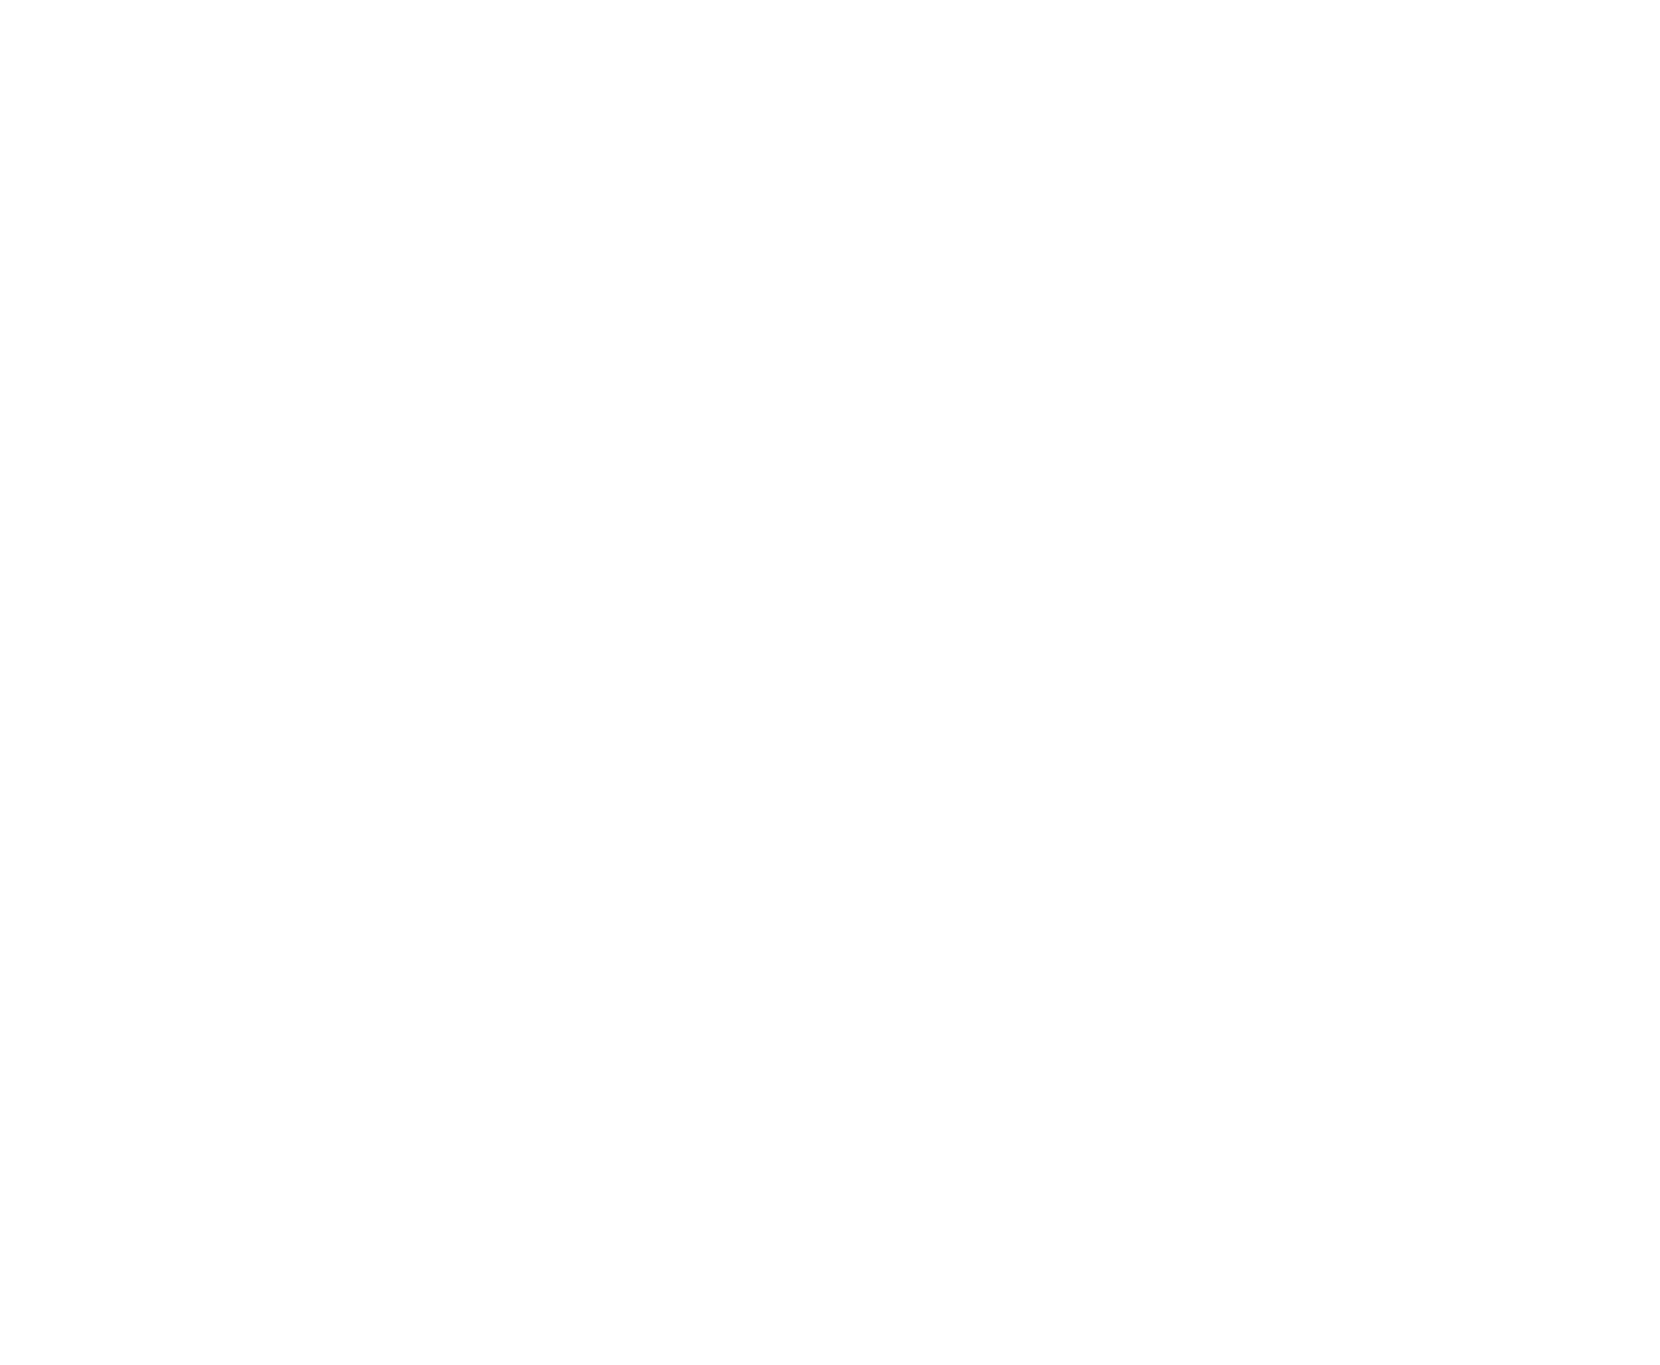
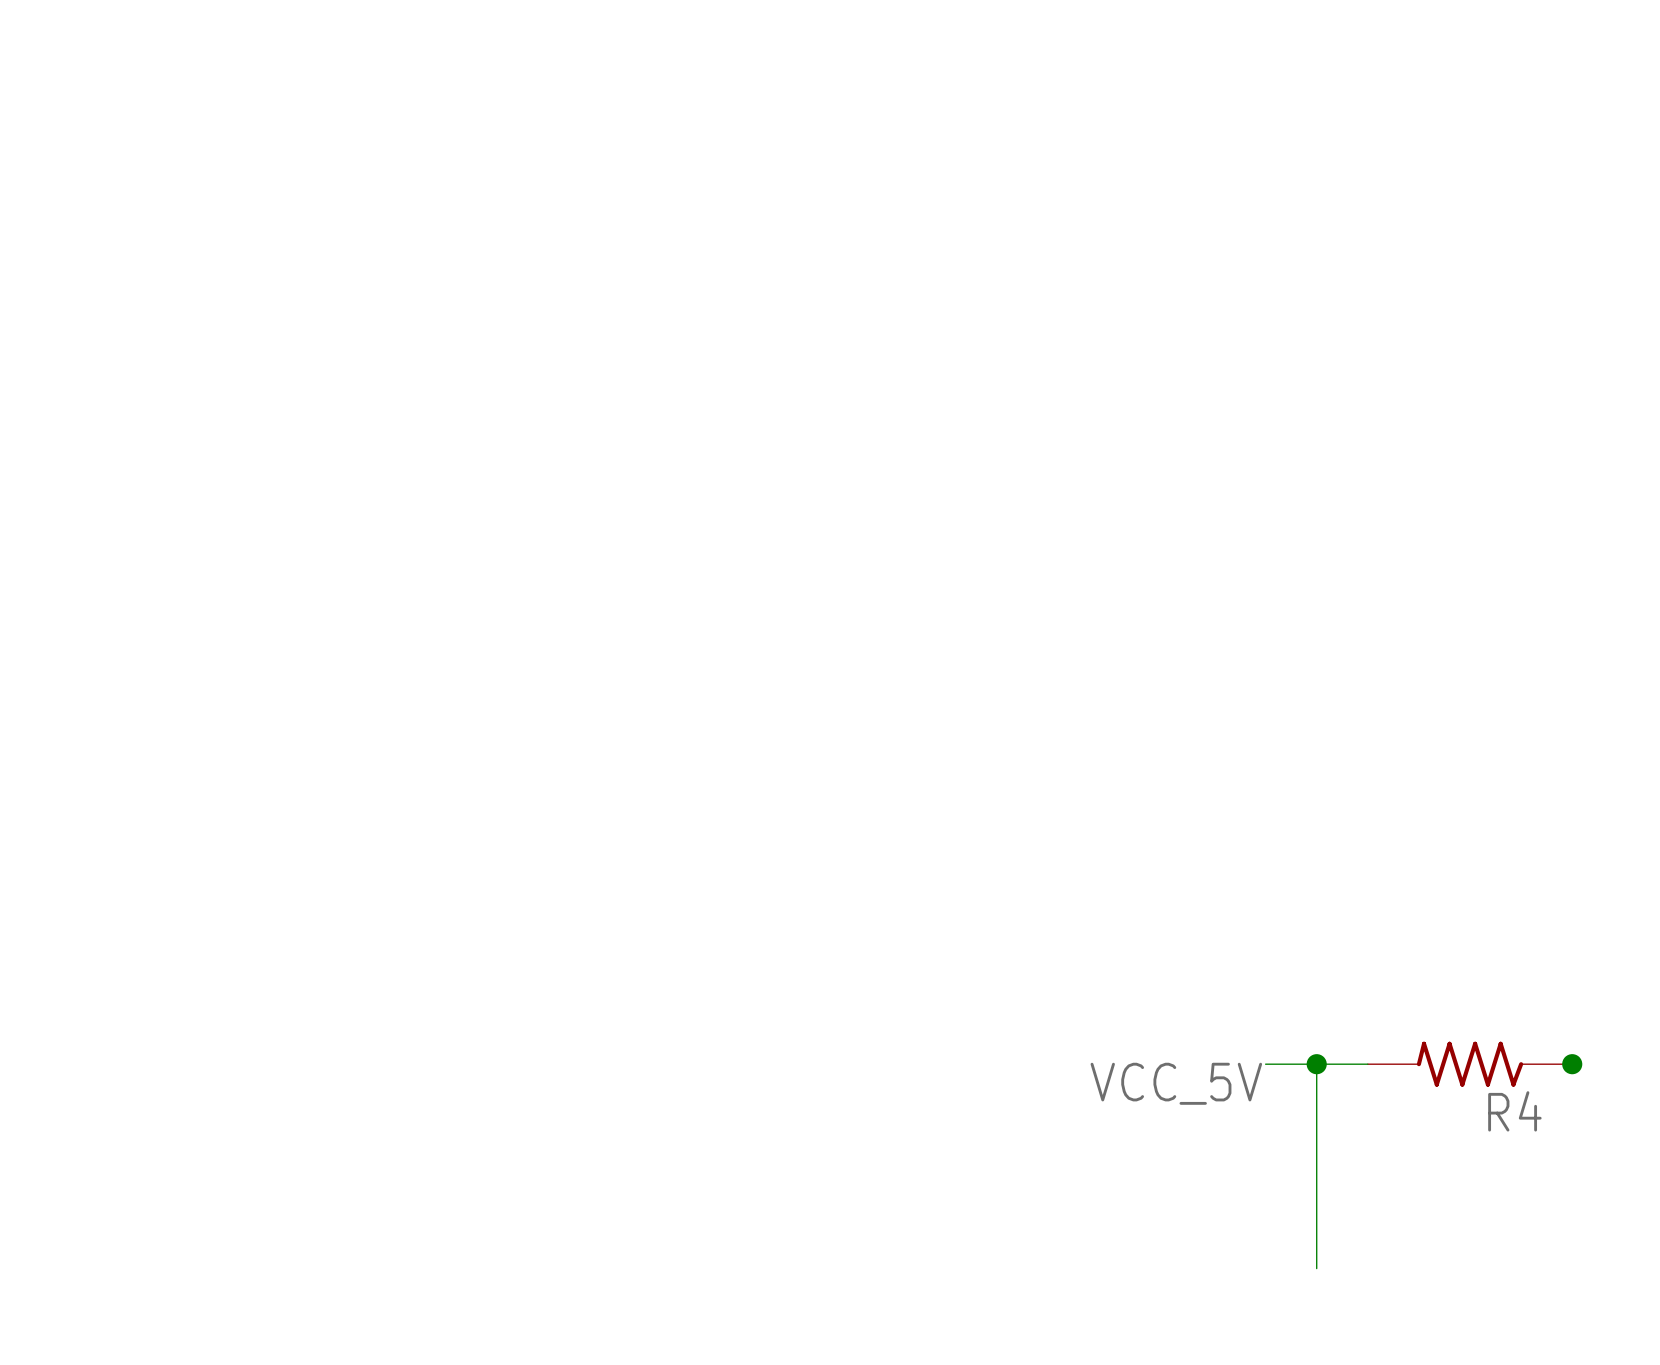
wire: none -> (1265, 1064) (1367, 1064)
wire: none -> (1316, 1064) (1316, 1268)
junction: none -> (1316, 1064)
R4: none -> (1470, 1064)
junction: none -> (1572, 1064)
label: none -> VCC_5V (1176, 1083)

